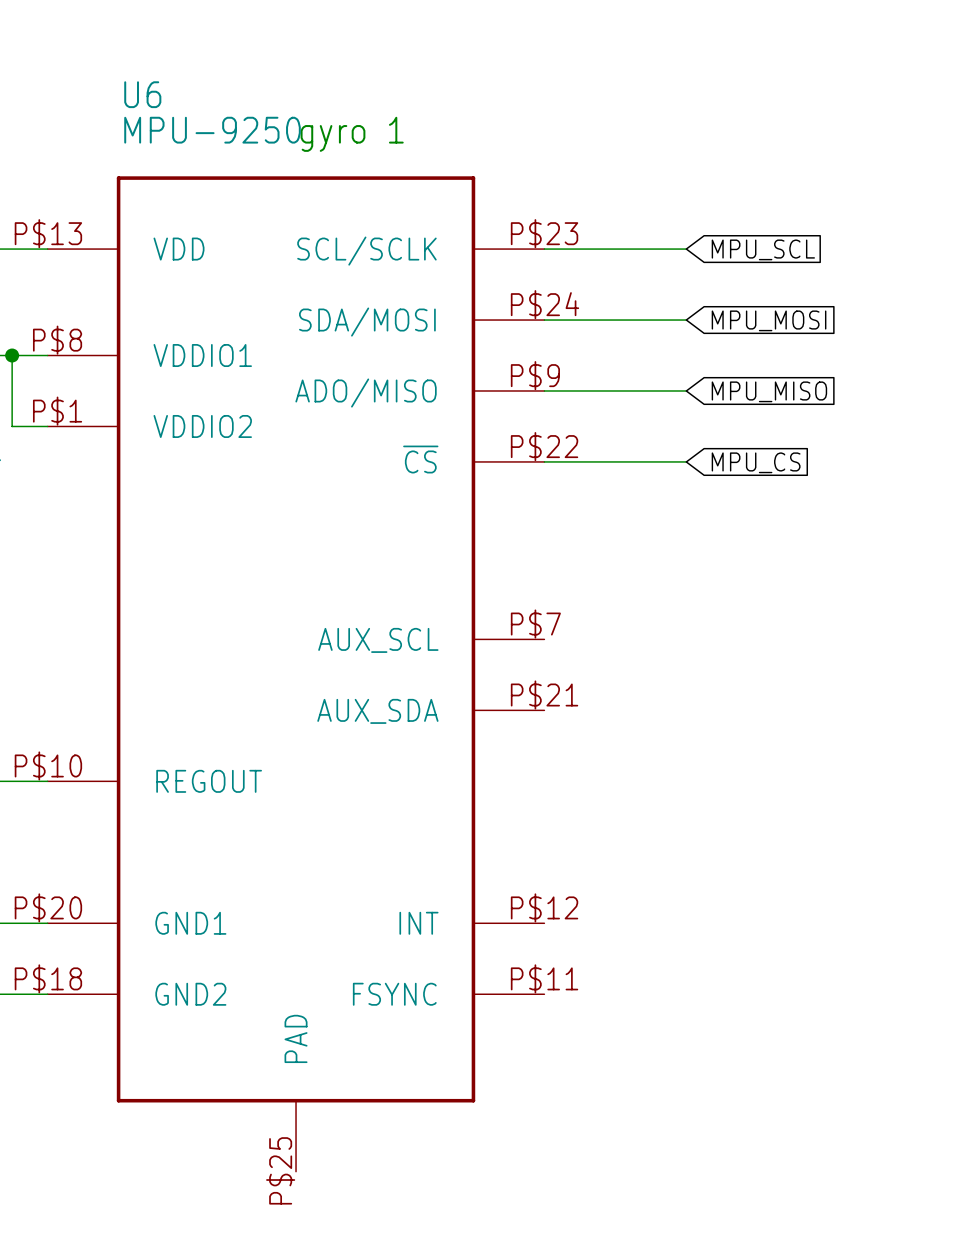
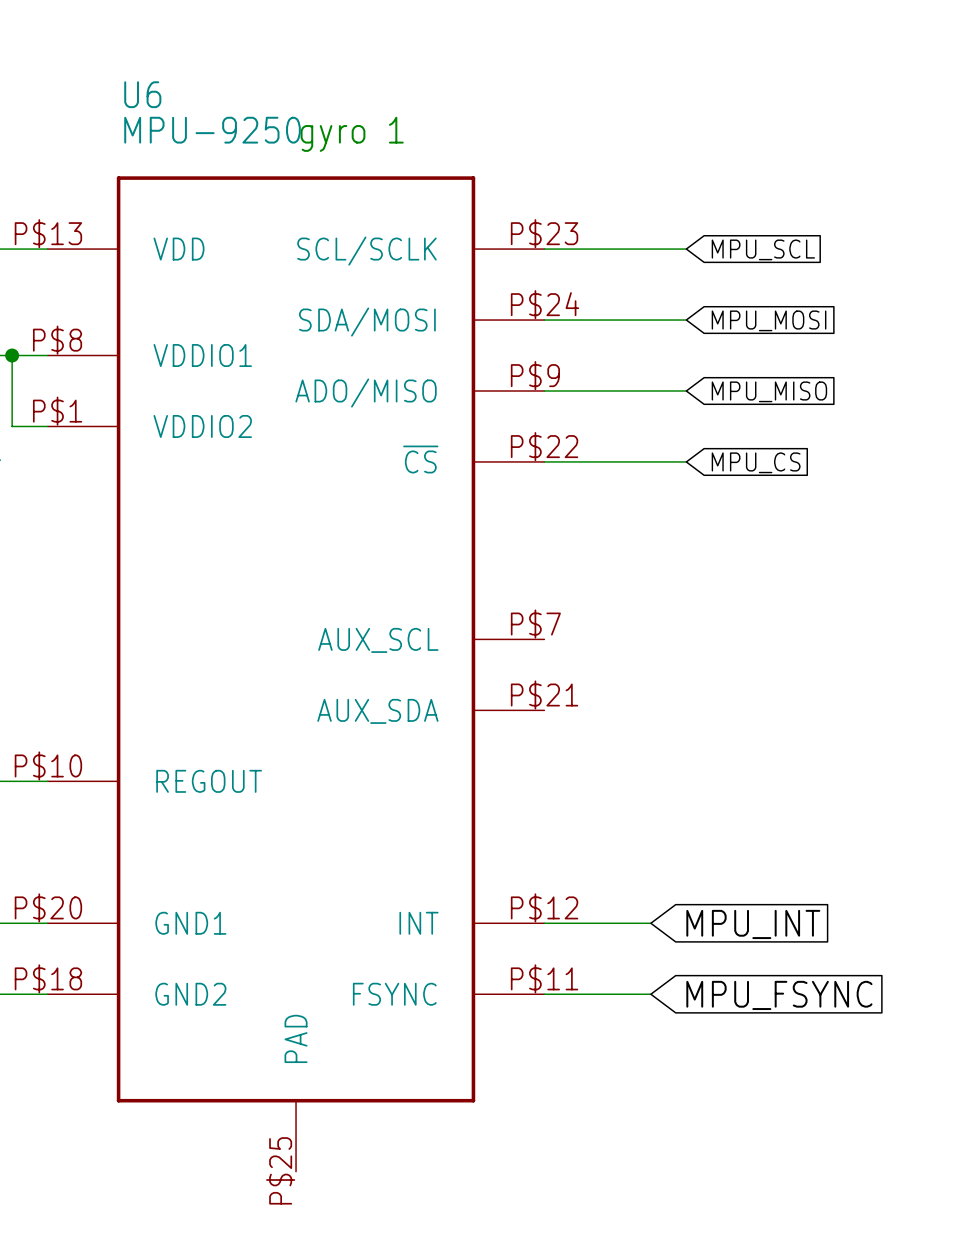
wire: none -> (544, 923) (650, 923)
global label: none -> MPU_INT (753, 924)
wire: none -> (544, 994) (650, 994)
global label: none -> MPU_FSYNC (779, 995)

